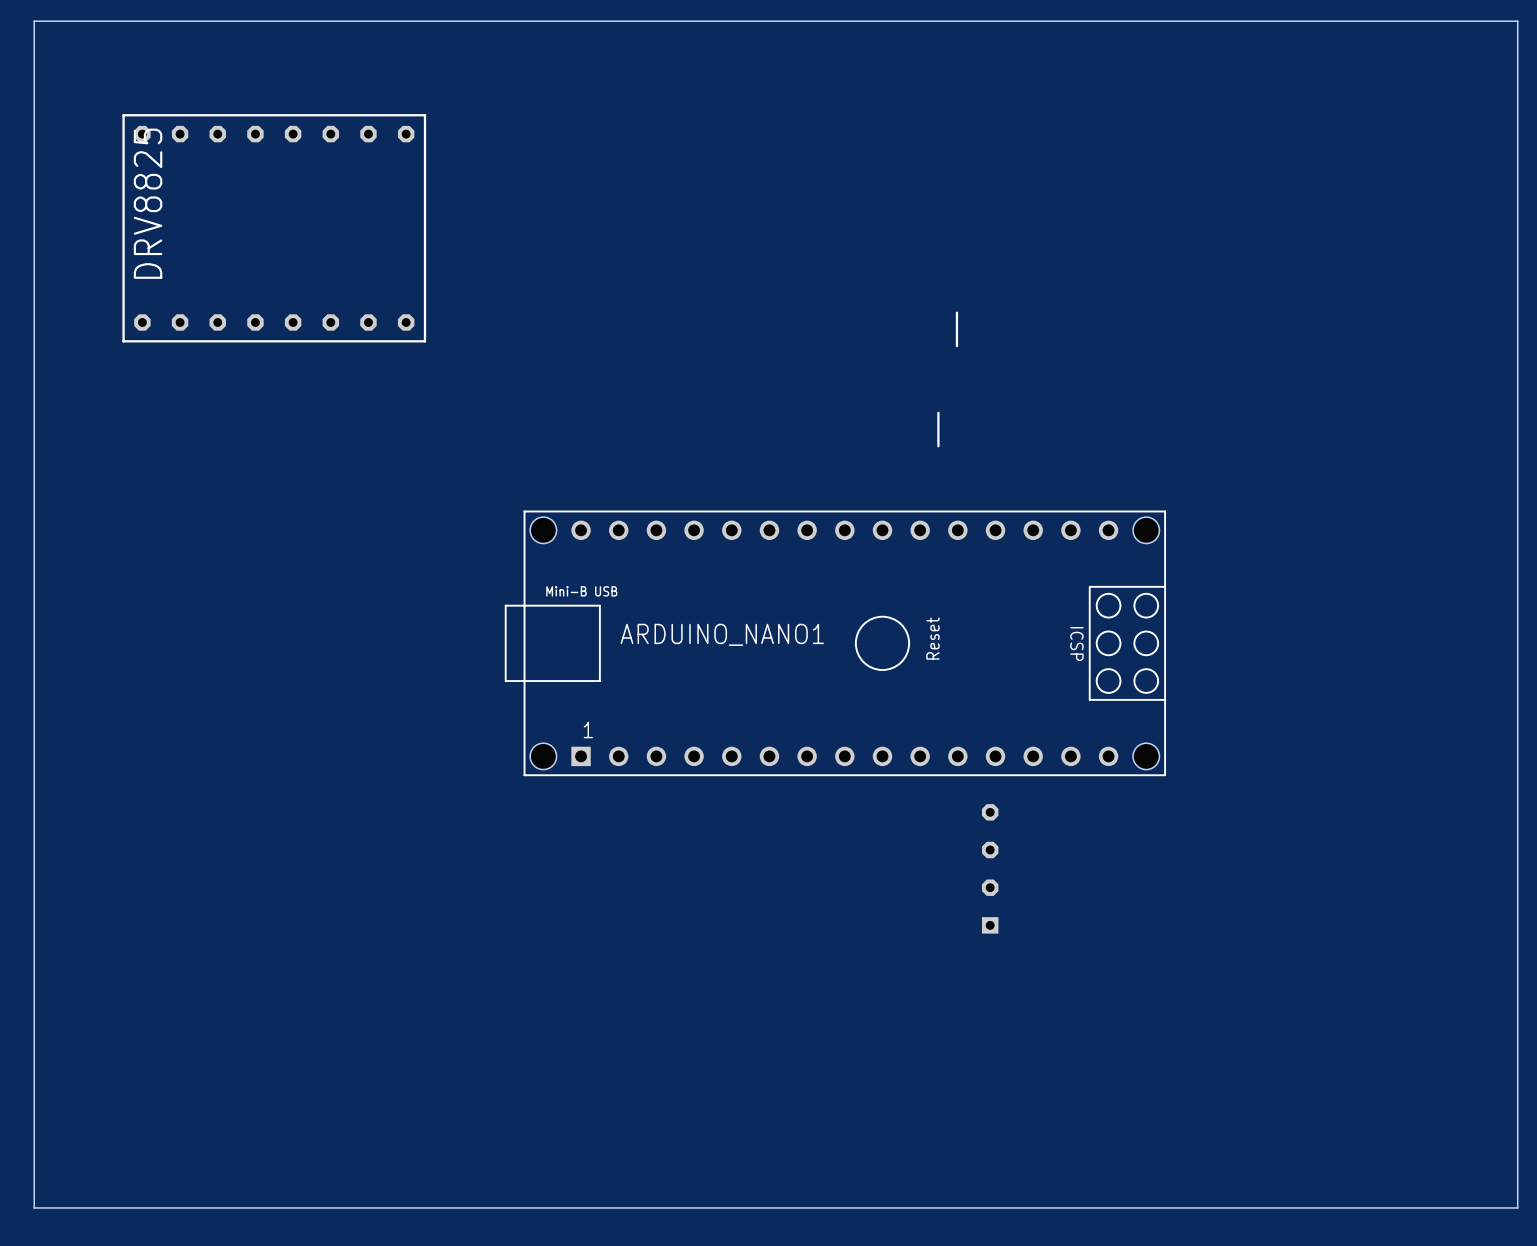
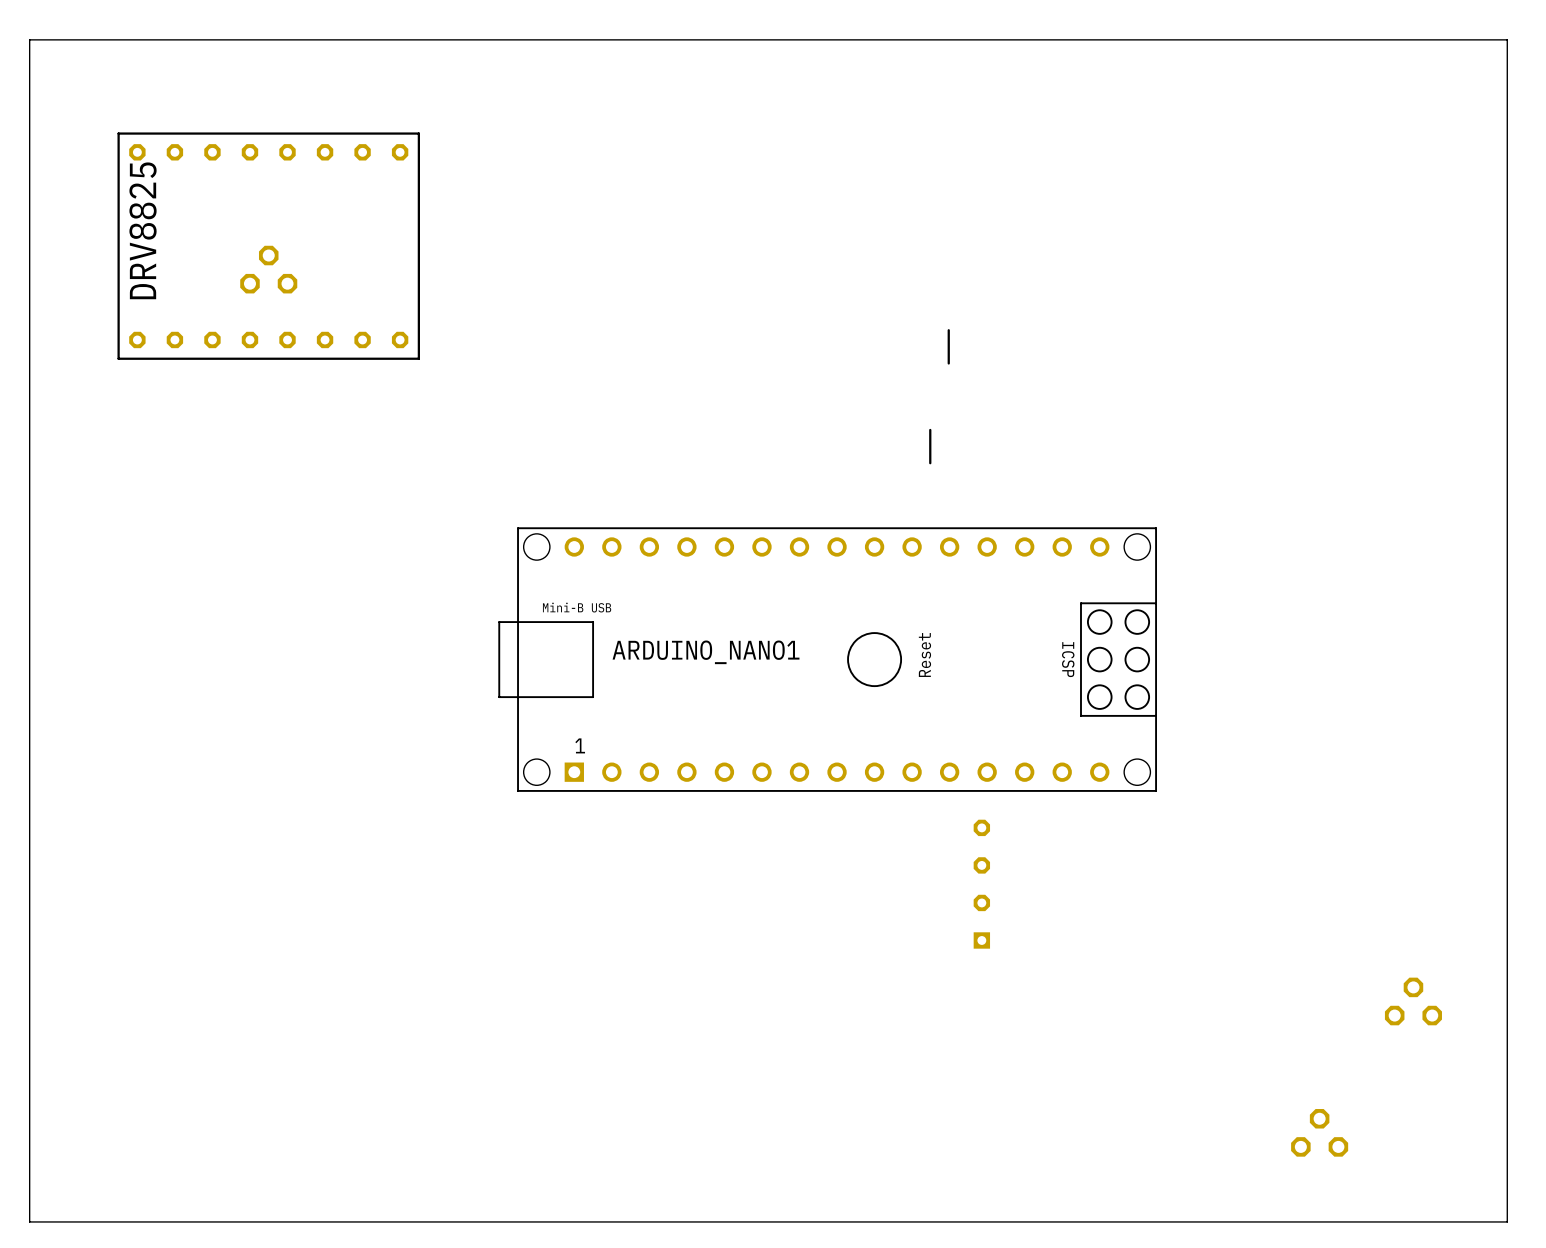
part: none -> (268, 269)
part: none -> (1413, 1001)
part: none -> (1319, 1132)

